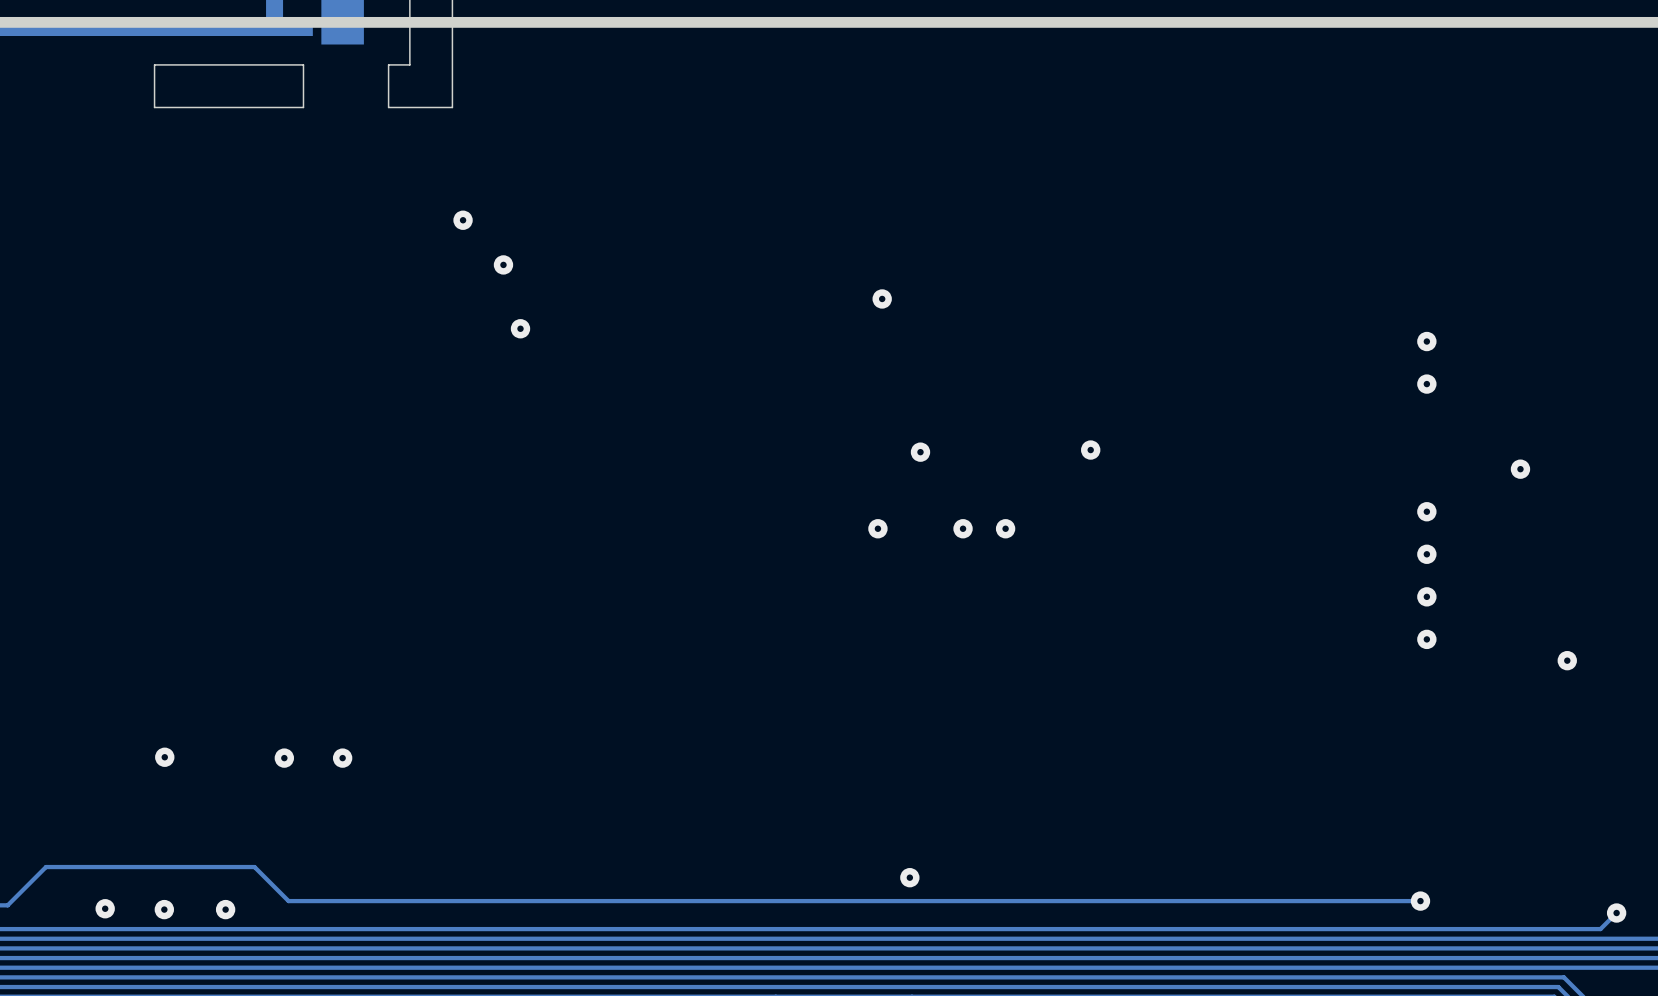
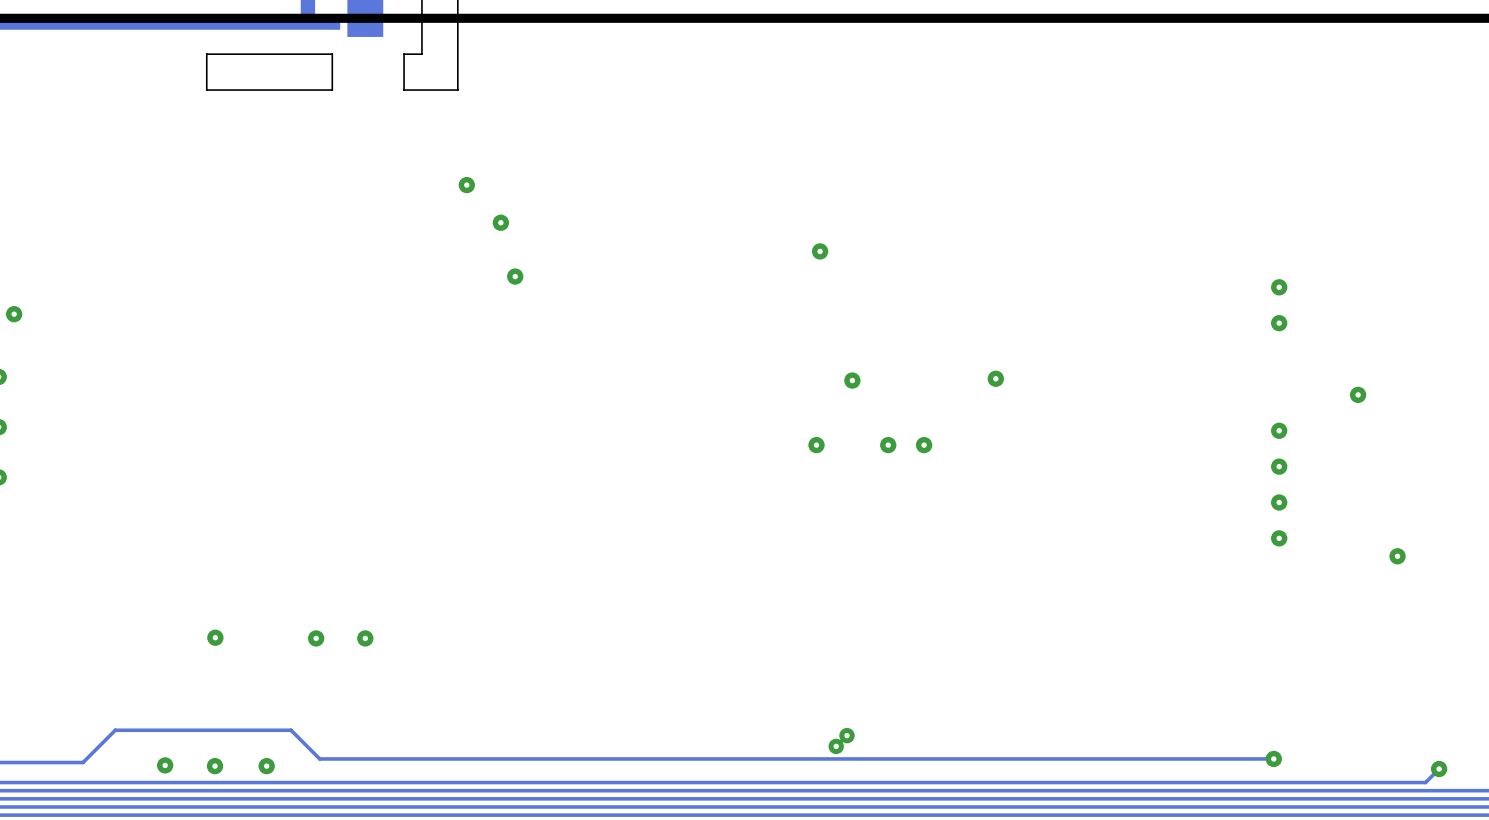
via: none -> (846, 735)
via: (909, 877) -> none
via: none -> (836, 746)

